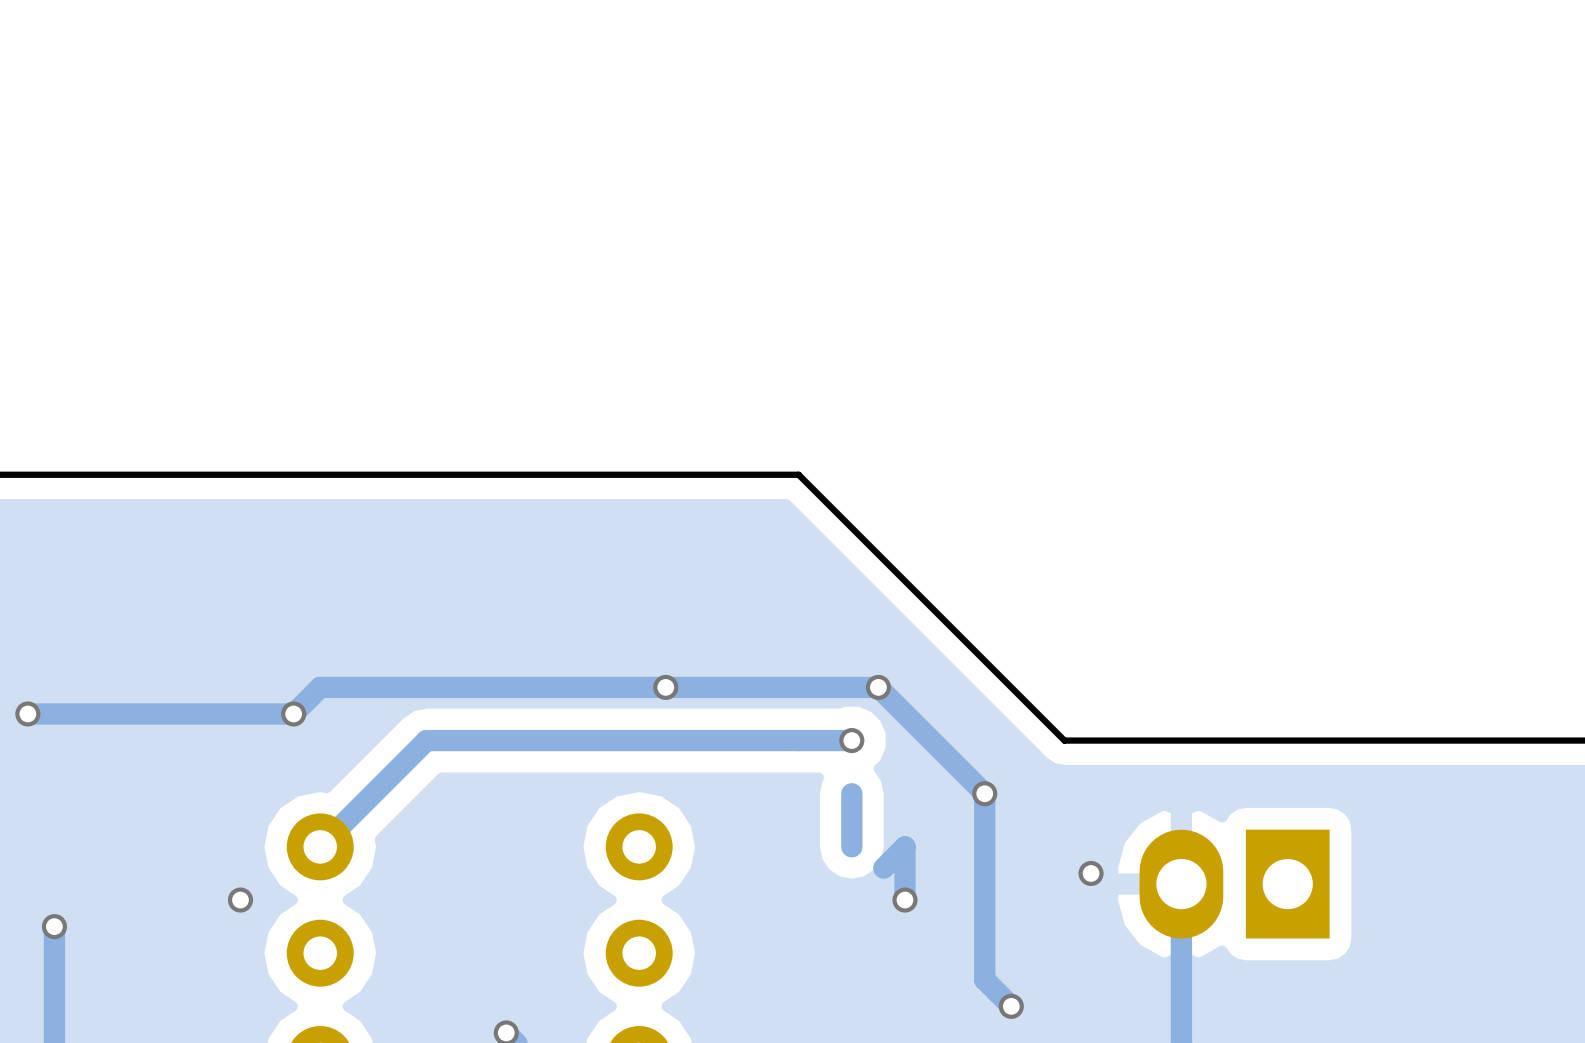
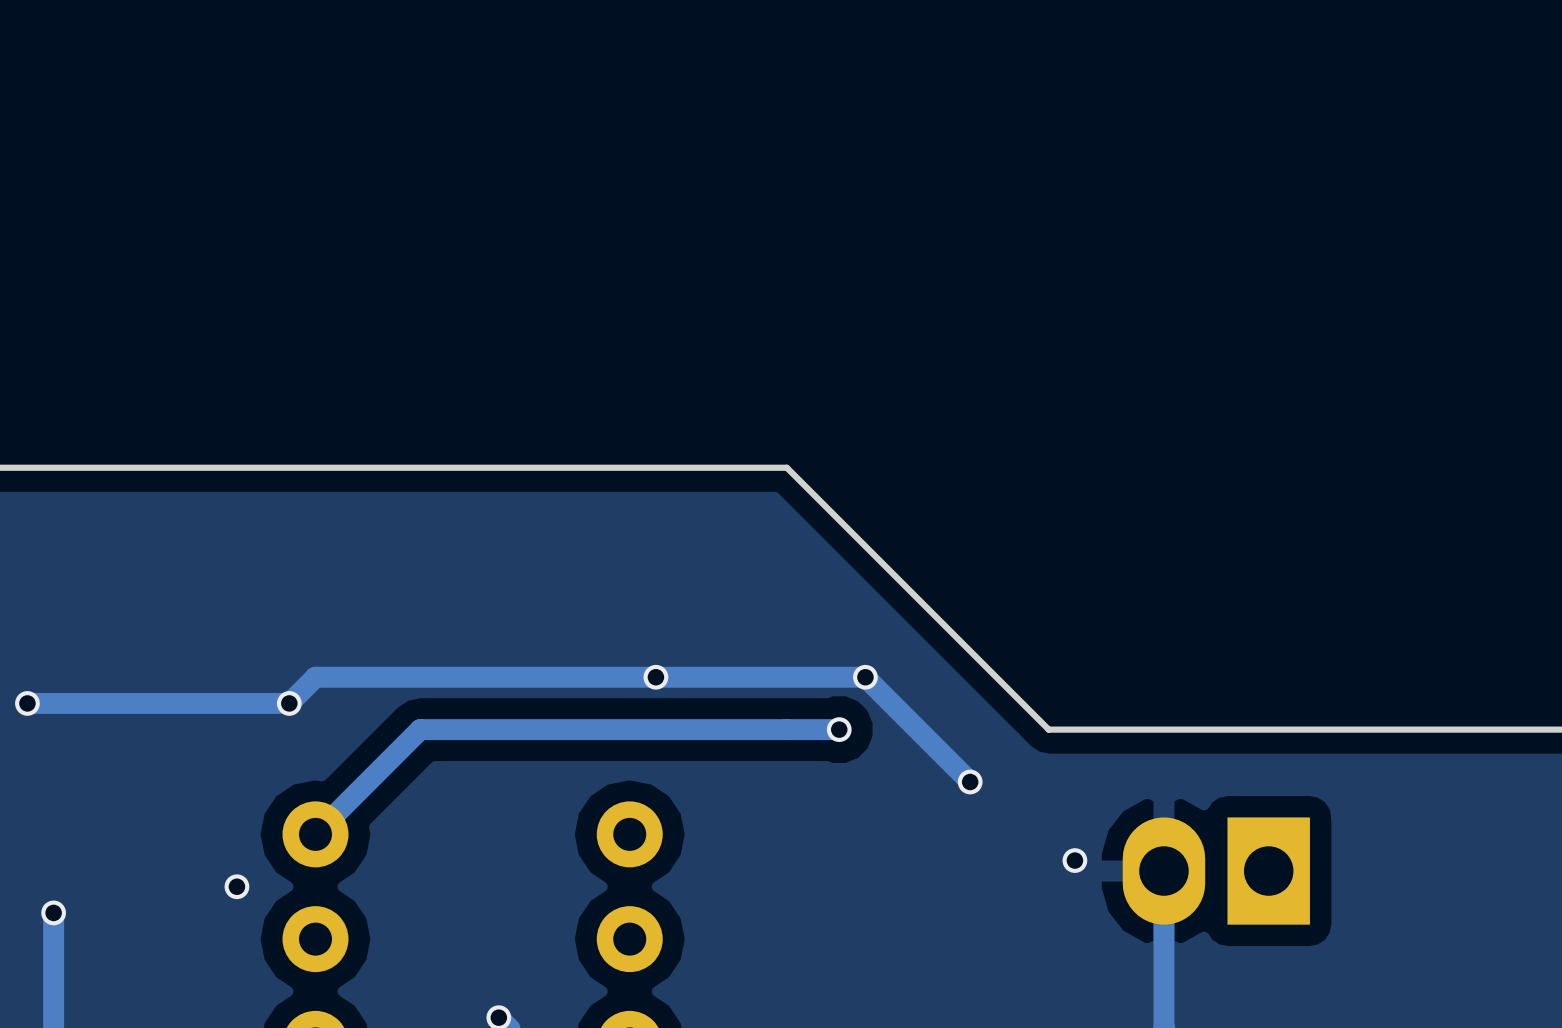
track: (851, 793) (851, 846) -> none
track: (984, 793) (984, 979) (1011, 1006) -> none
track: (883, 868) (904, 846) (904, 900) -> none
via: (904, 900) -> none
via: (1011, 1006) -> none

